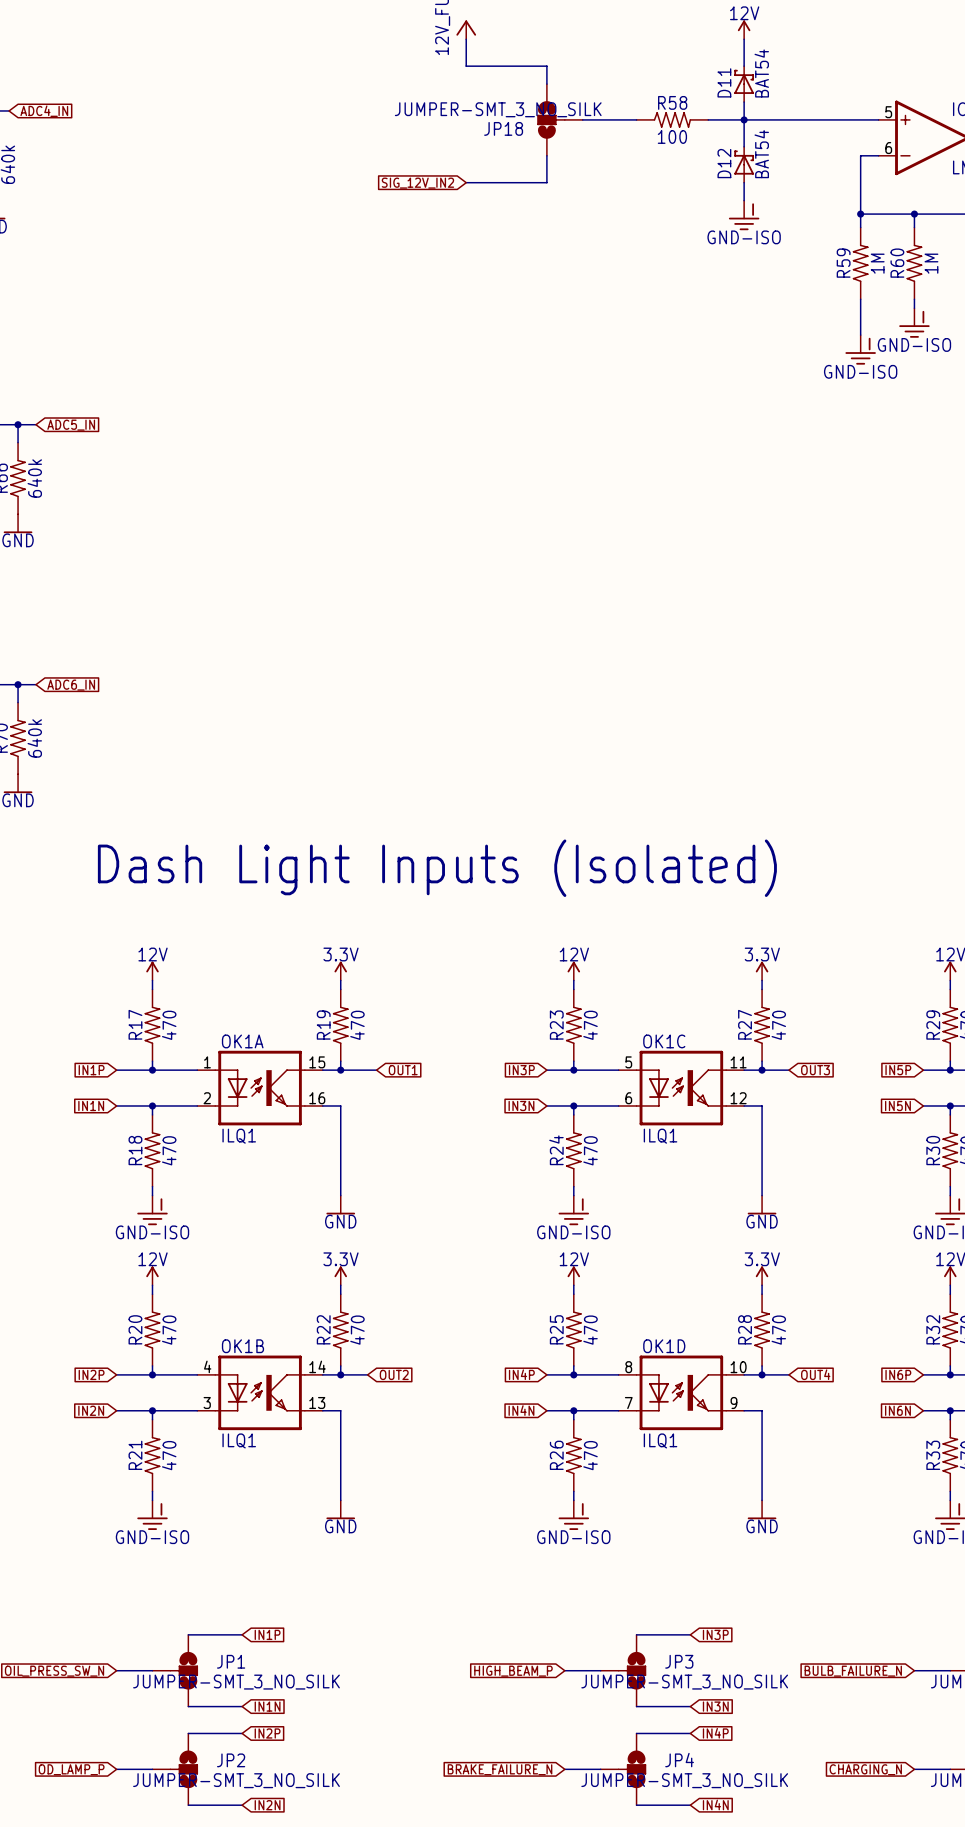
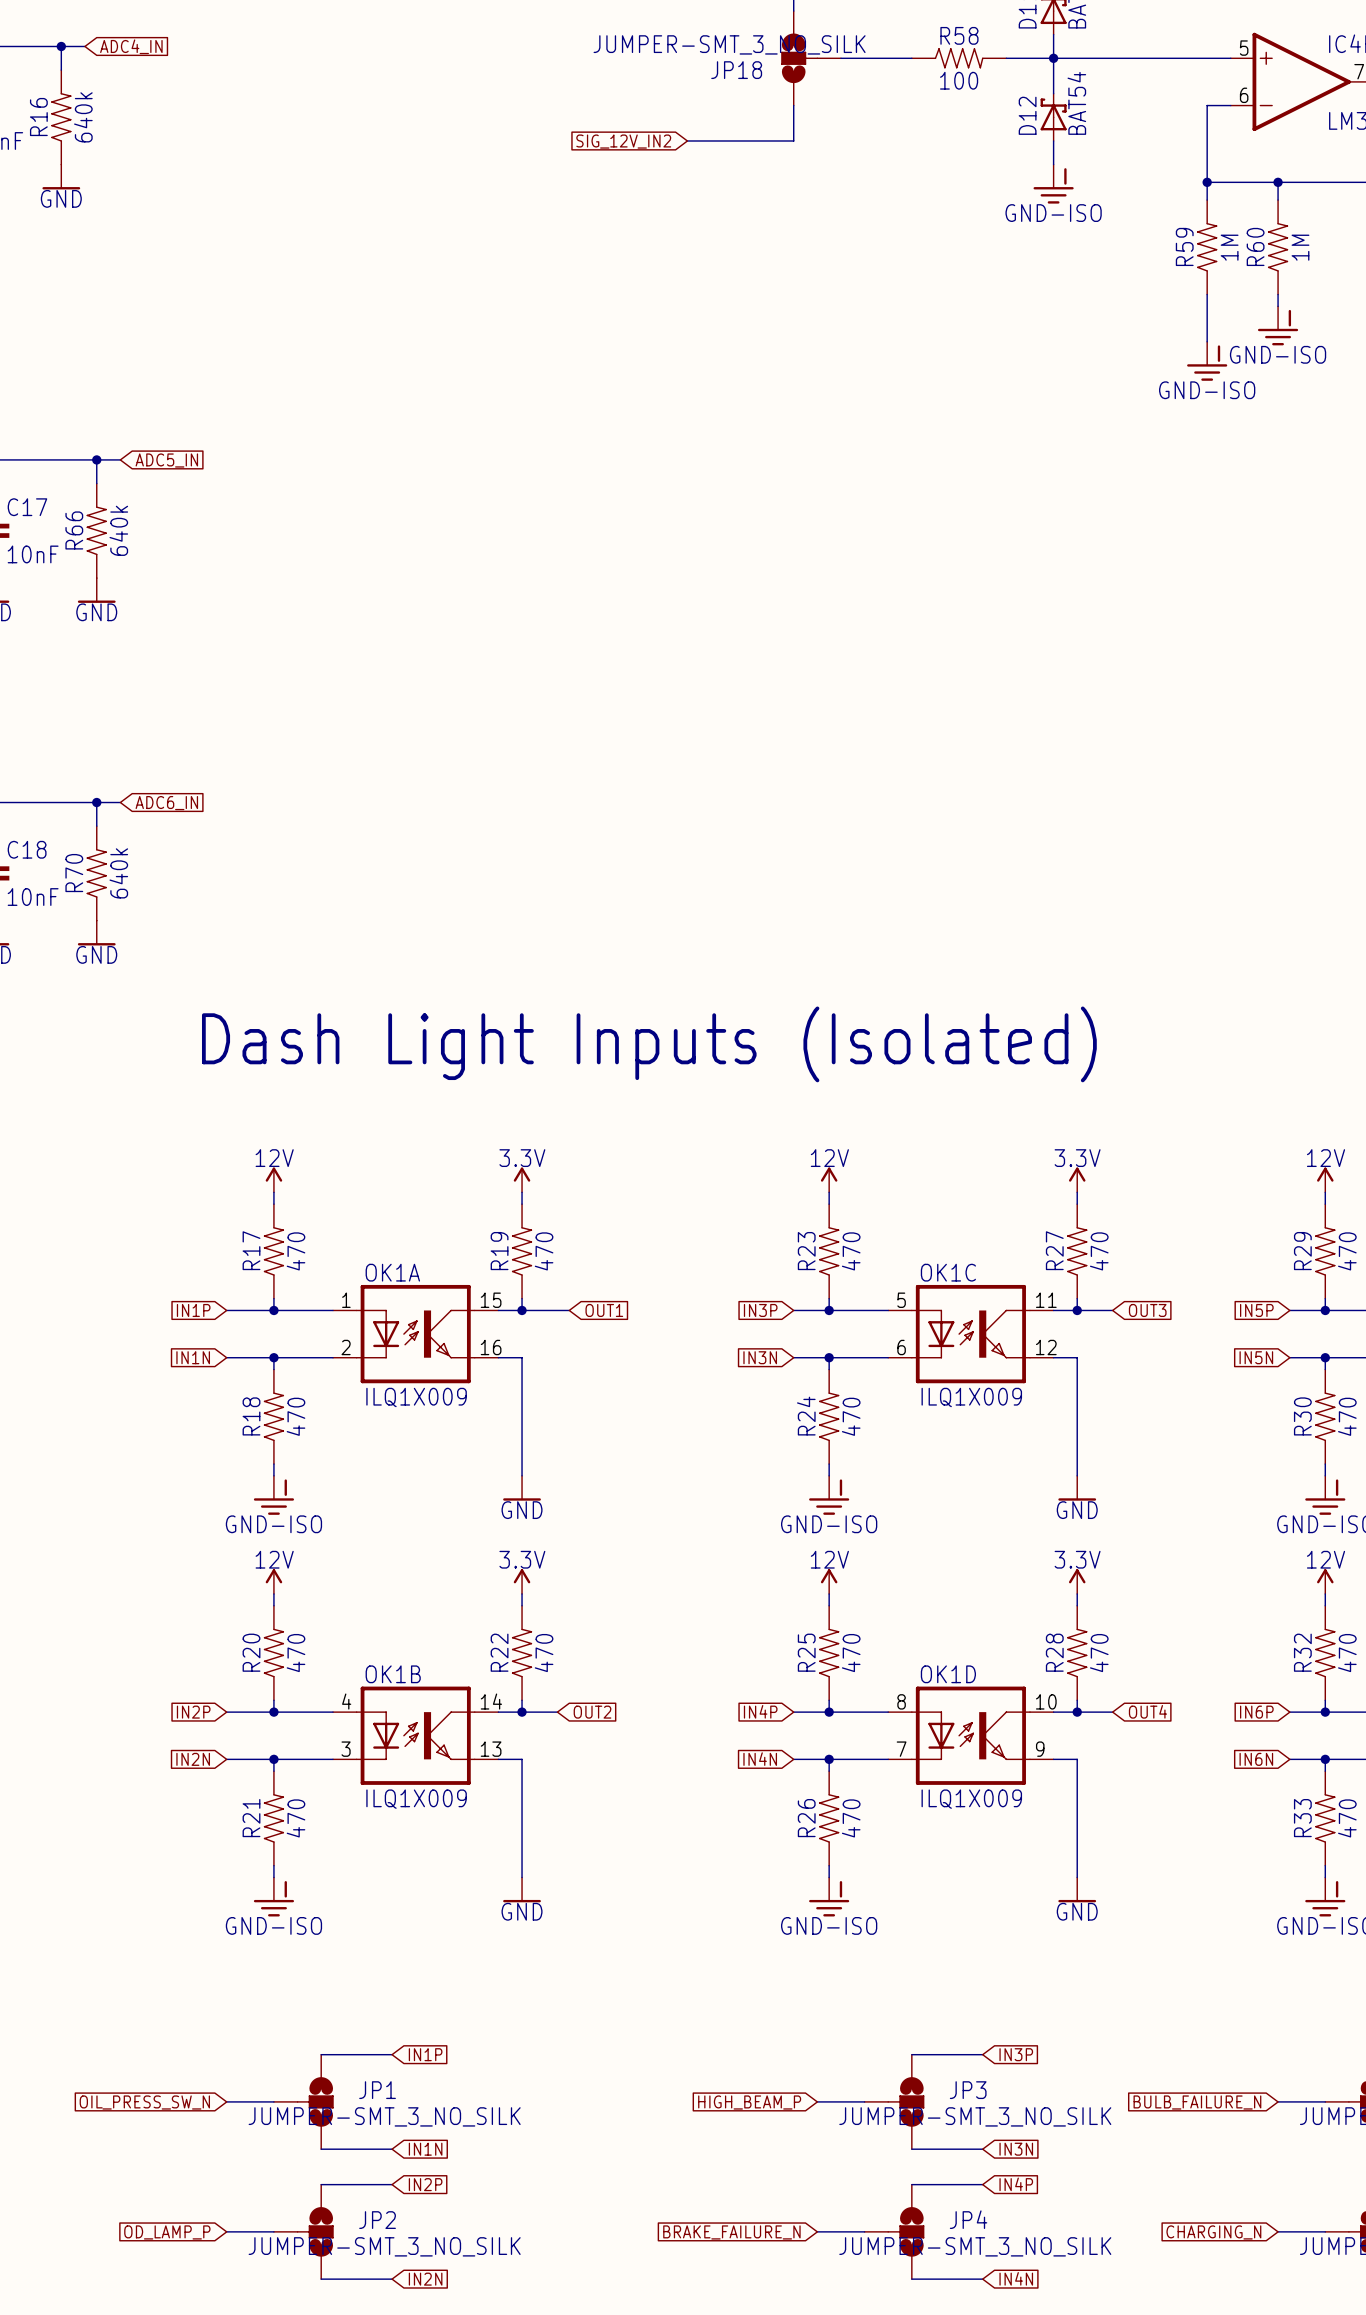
OK1A value: ILQ1 (239, 1136) -> ILQ1X009 (416, 1397)
OK1C value: ILQ1 (660, 1136) -> ILQ1X009 (971, 1397)
OK1B value: ILQ1 (239, 1440) -> ILQ1X009 (416, 1799)
OK1D value: ILQ1 (660, 1440) -> ILQ1X009 (971, 1799)

